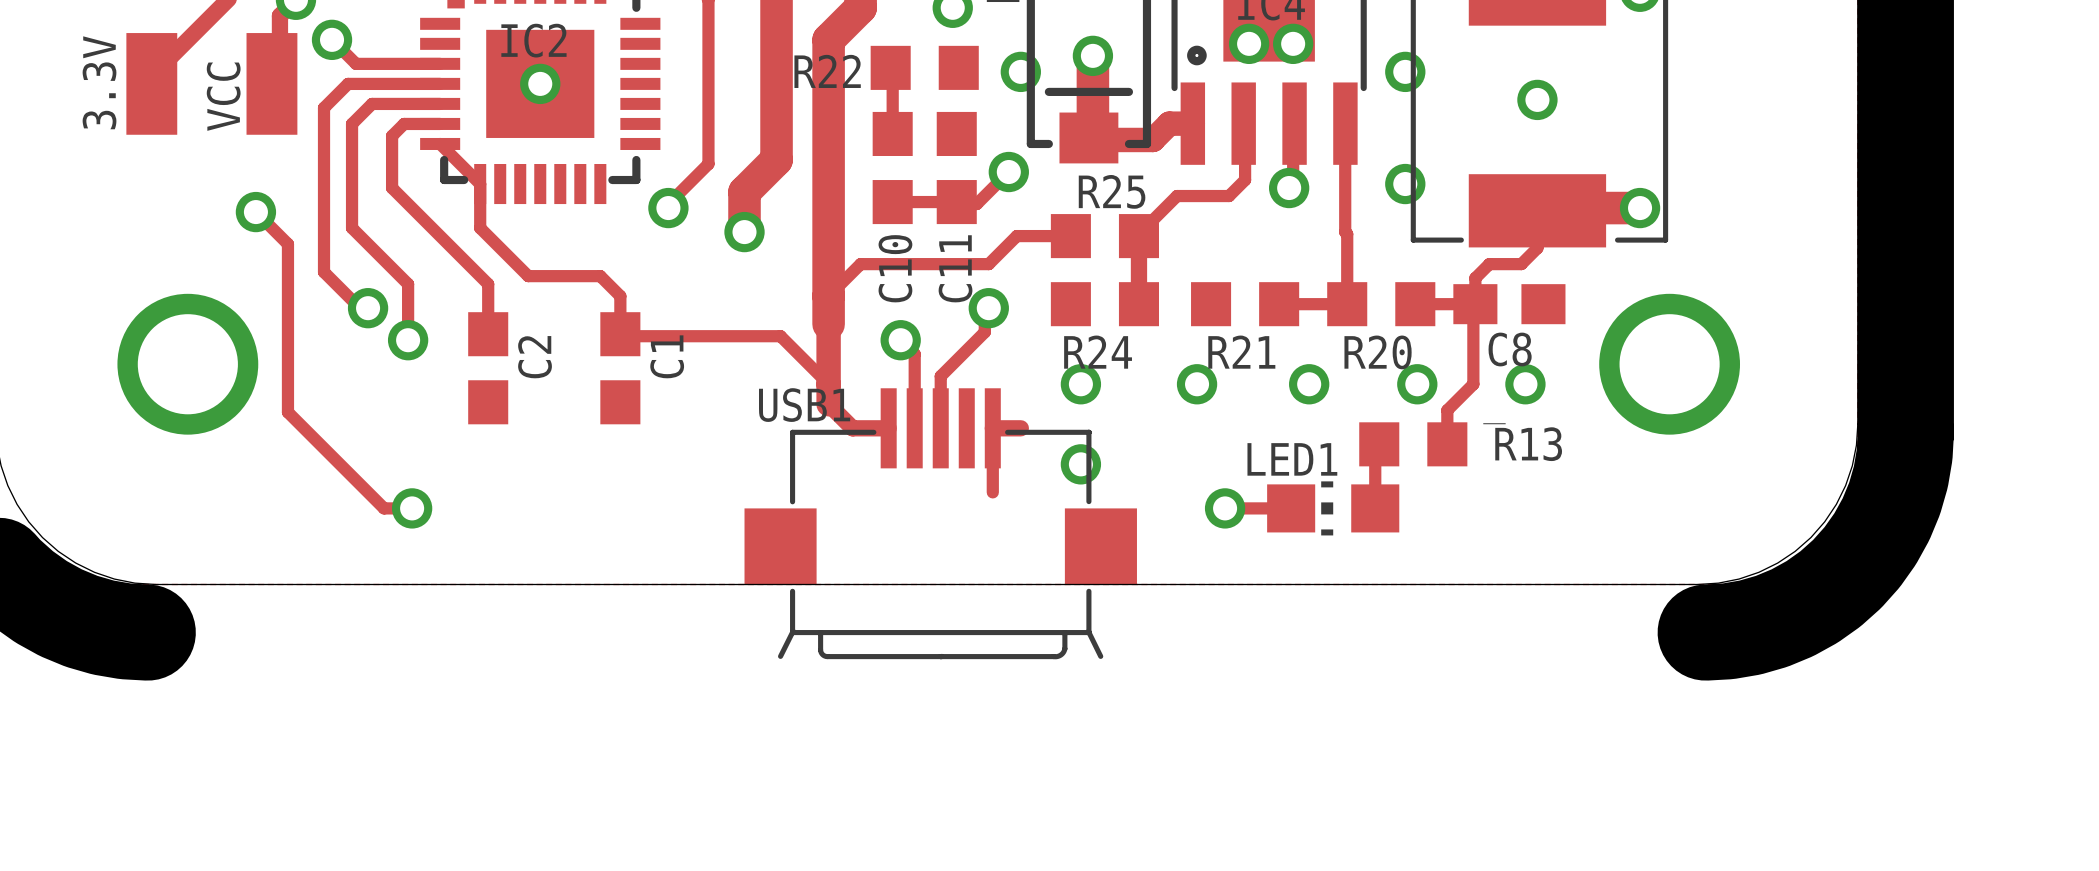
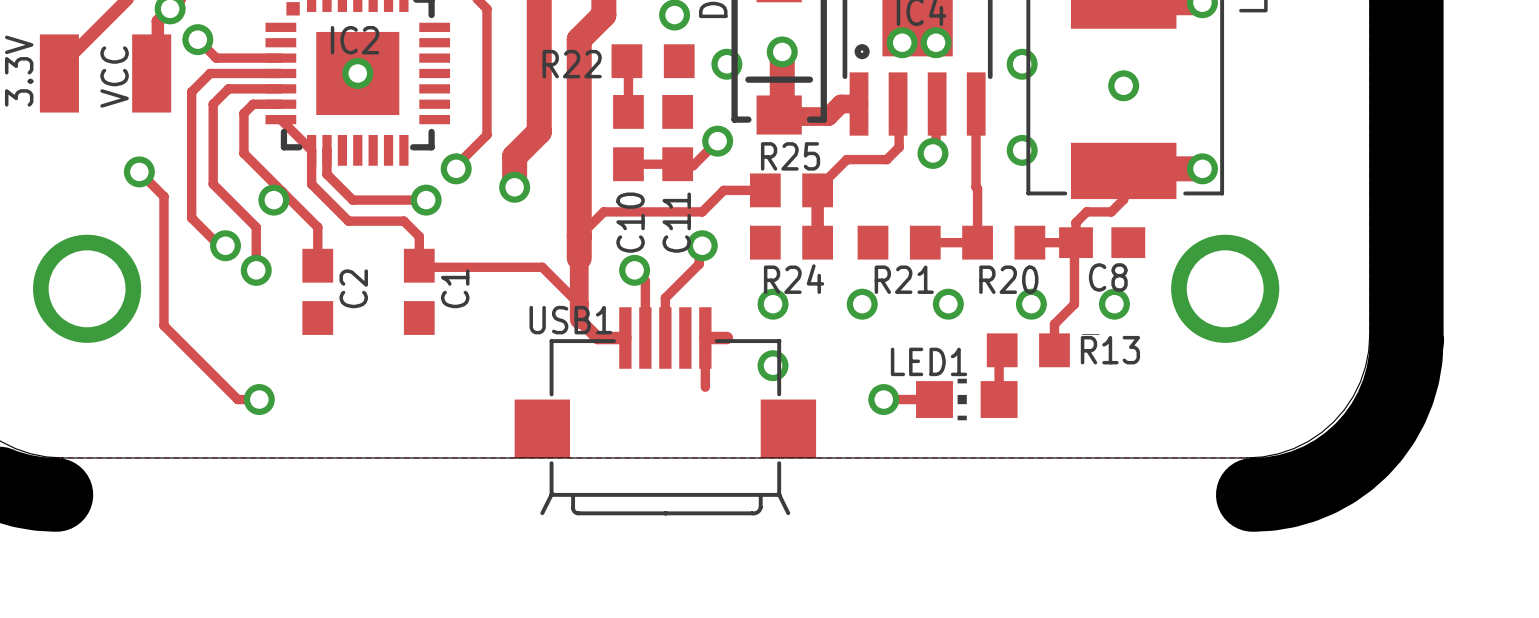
track: none -> (326, 150) (326, 174) (352, 200) (426, 200)
via: none -> (273, 200)
via: none -> (426, 200)

